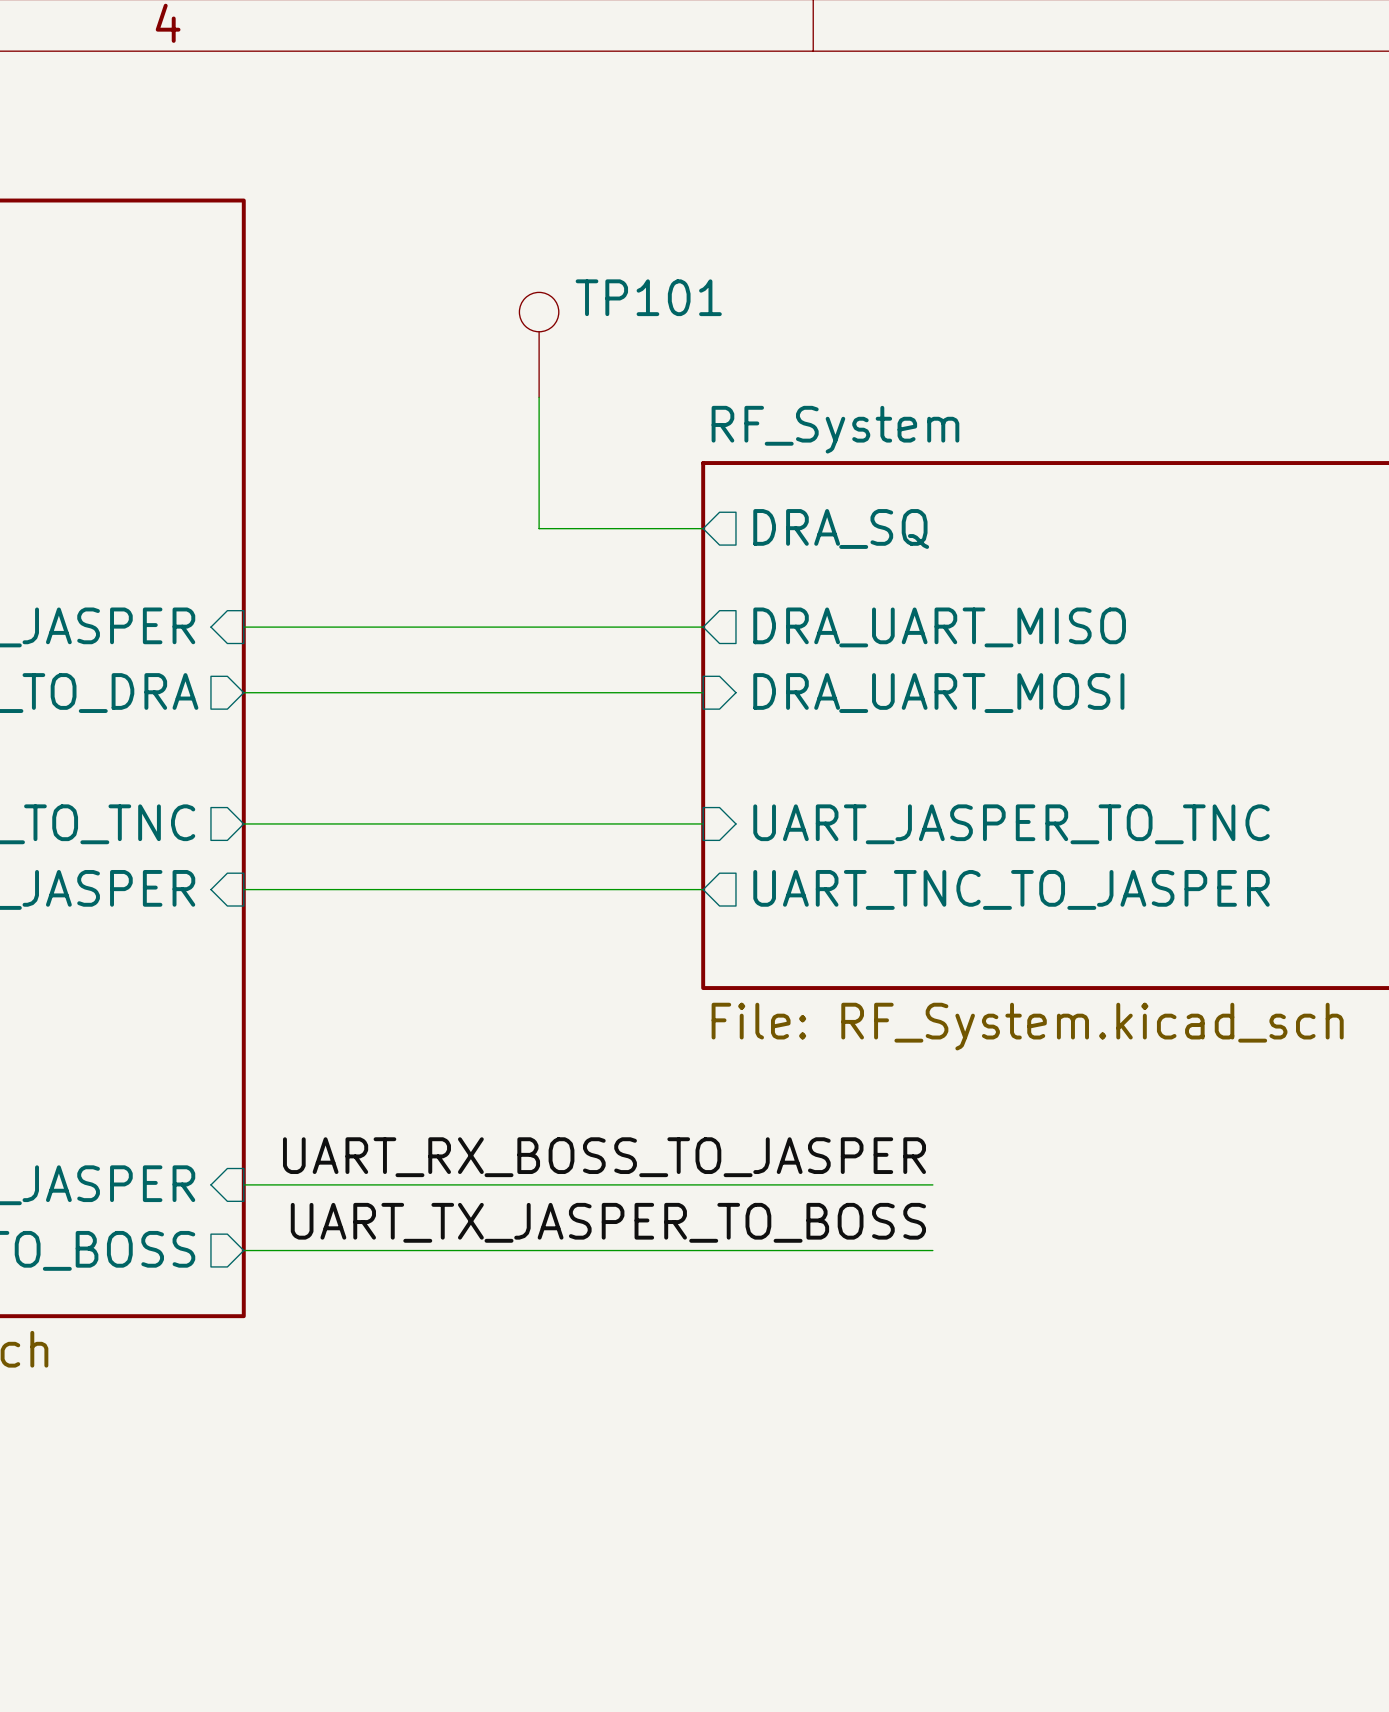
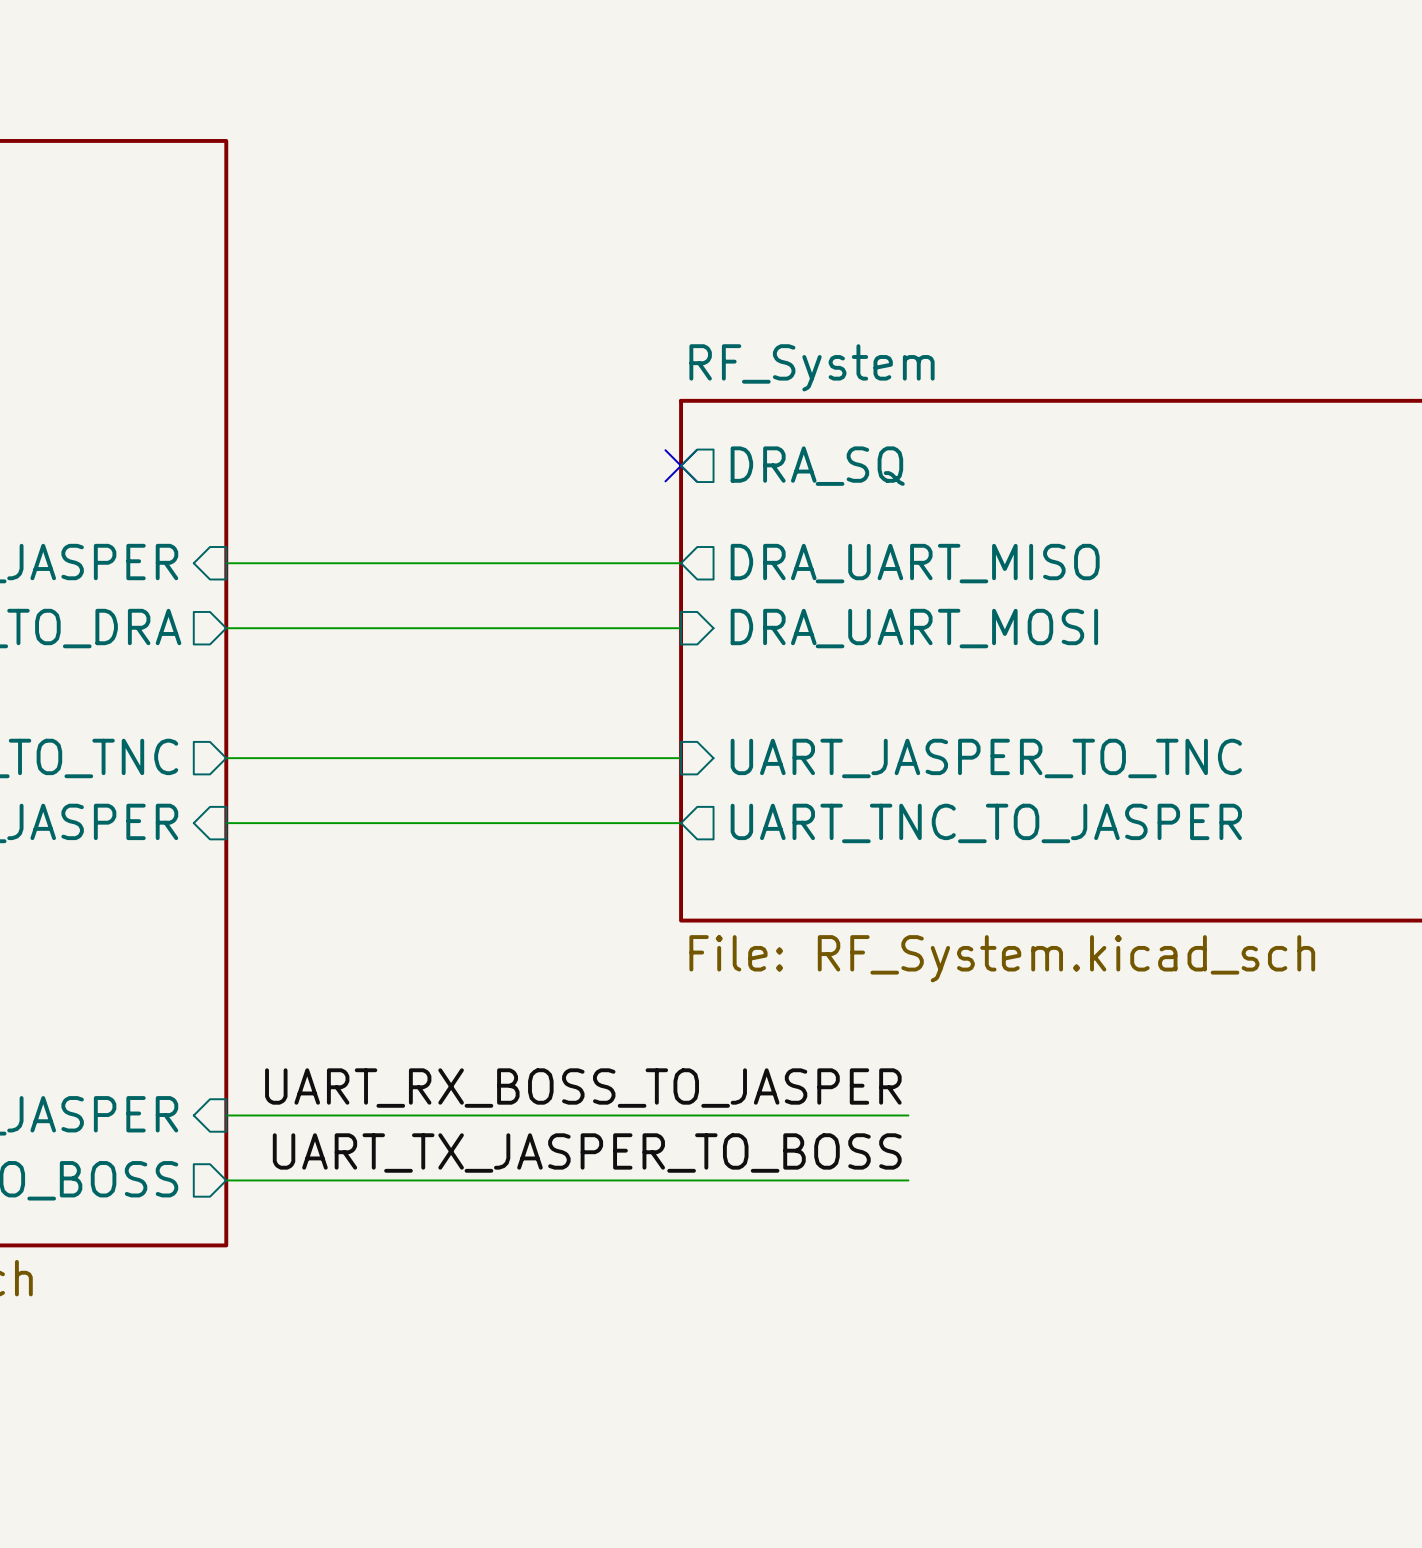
TP101: (539, 344) -> none
wire: (539, 397) (539, 528) (703, 528) -> none
no-connect mark: none -> (681, 465)

